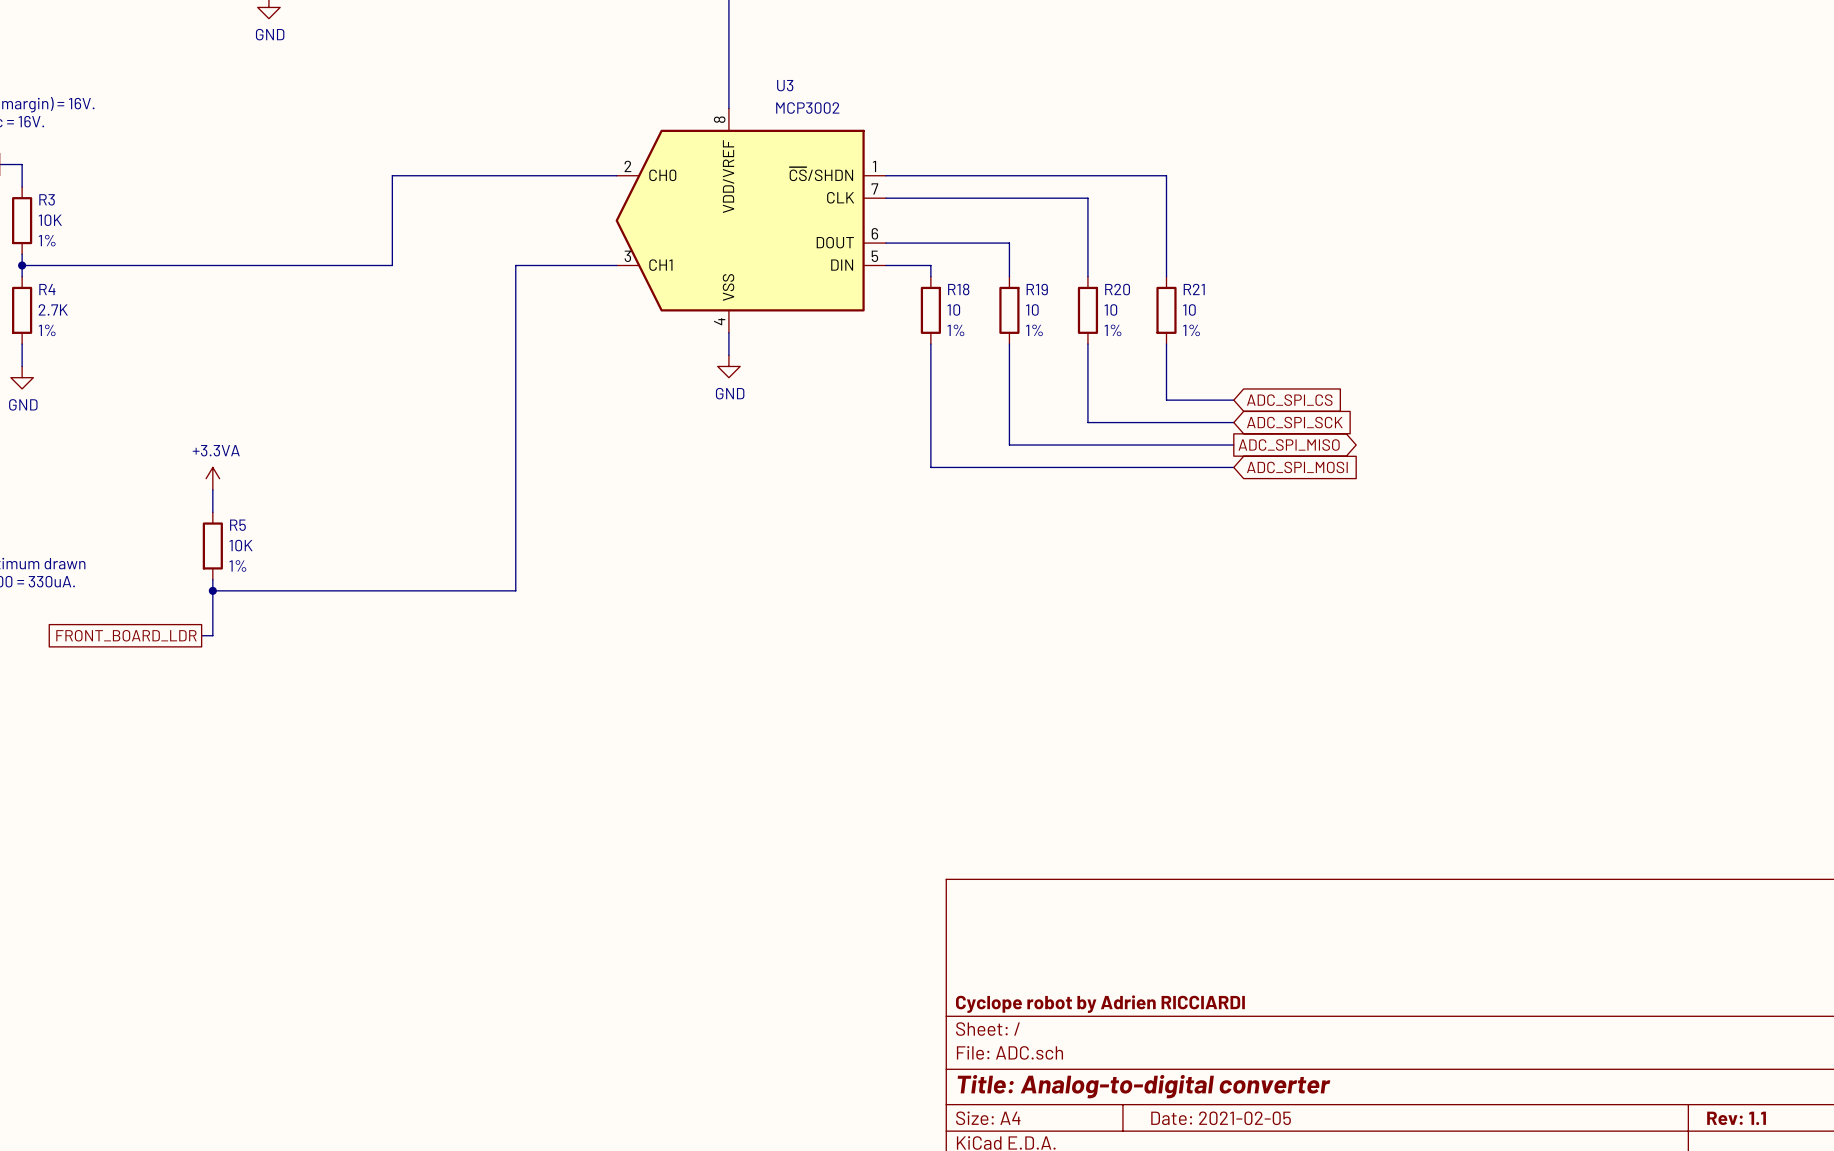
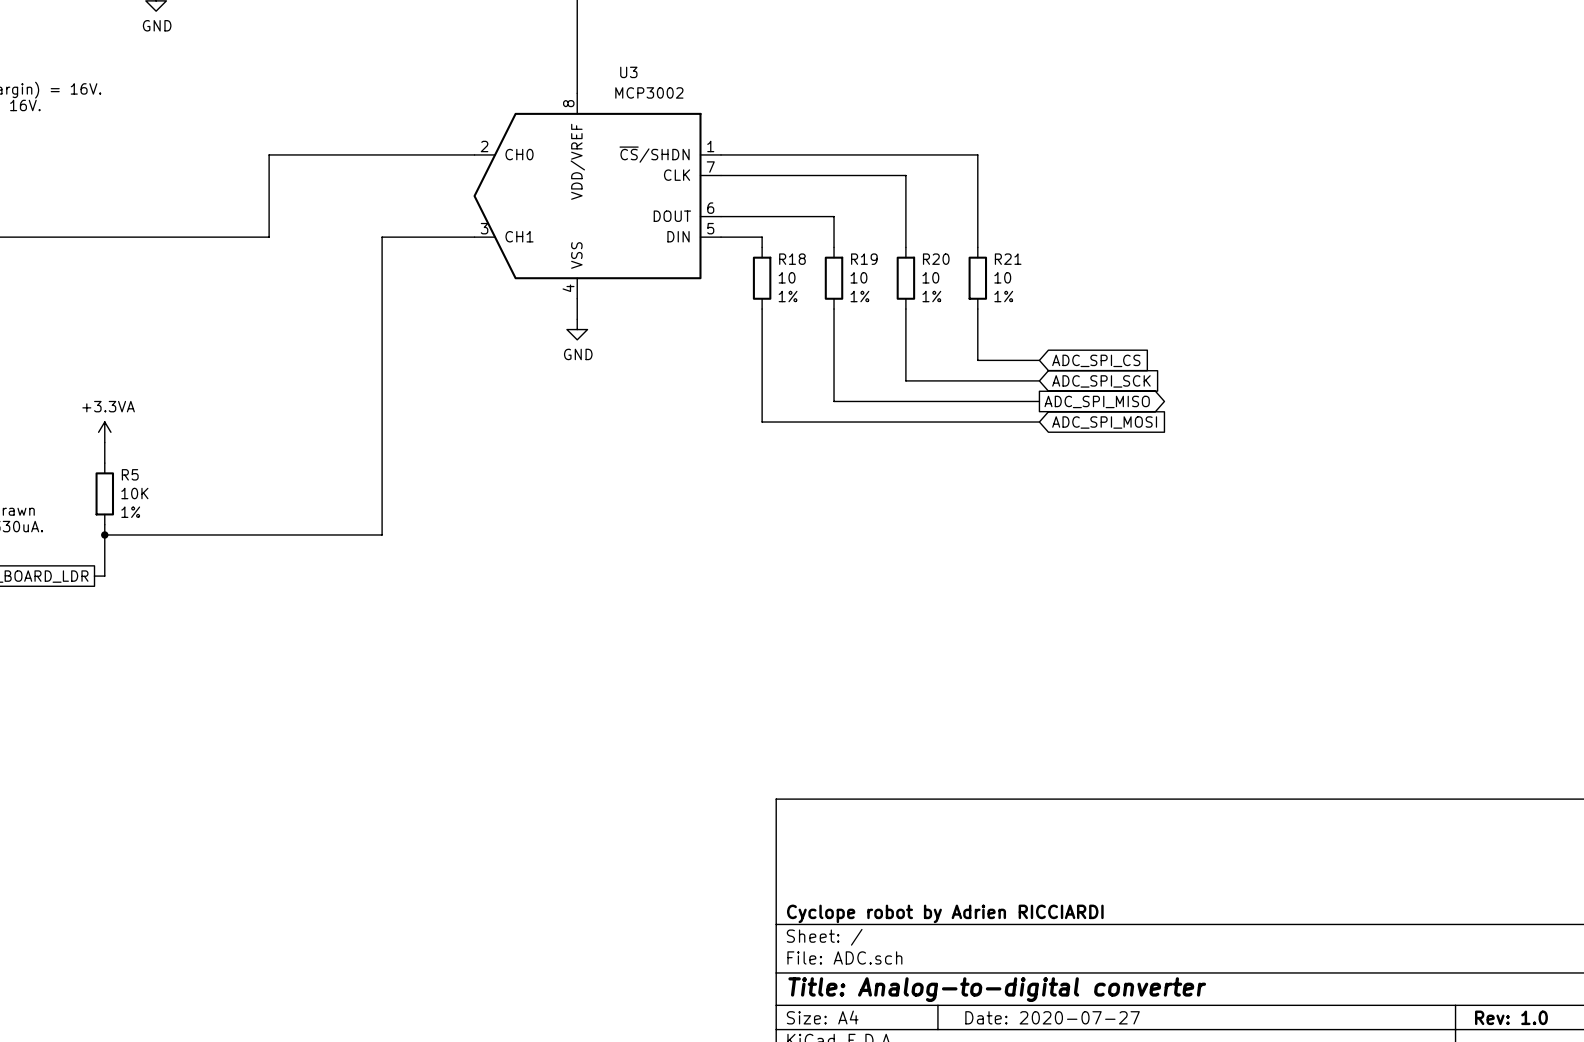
title block: Date: 2021-02-05 (1221, 1118) -> Date: 2020-07-27 (1052, 1017)
title block: Rev: 1.1 (1736, 1118) -> Rev: 1.0 (1511, 1017)

